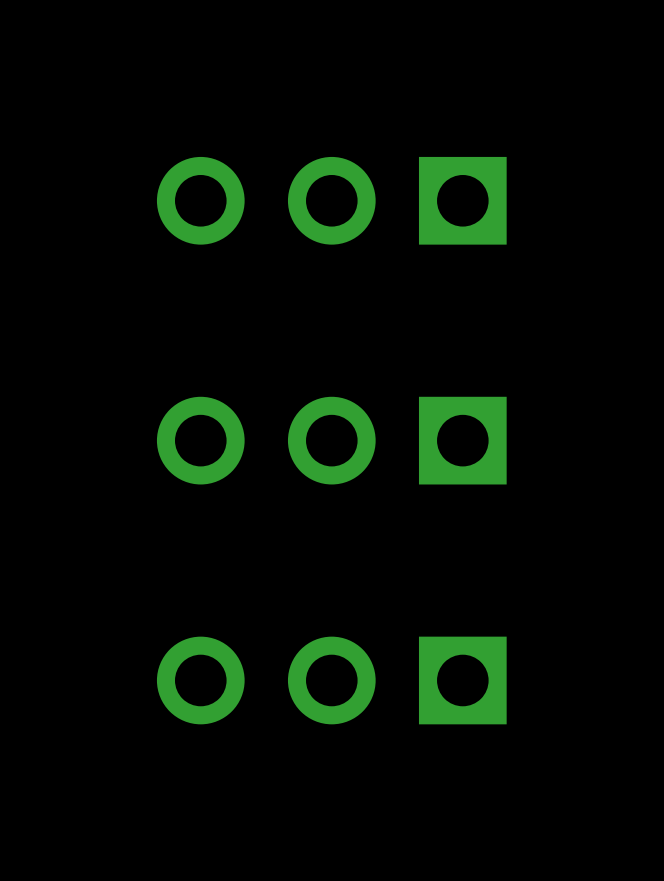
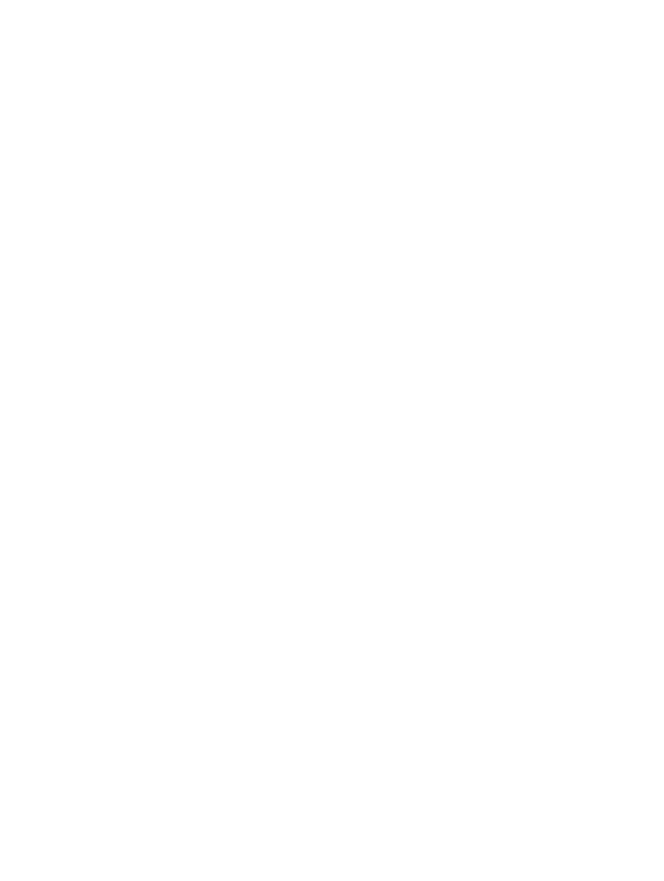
part: (331, 200) -> none
part: (331, 440) -> none
part: (331, 680) -> none

